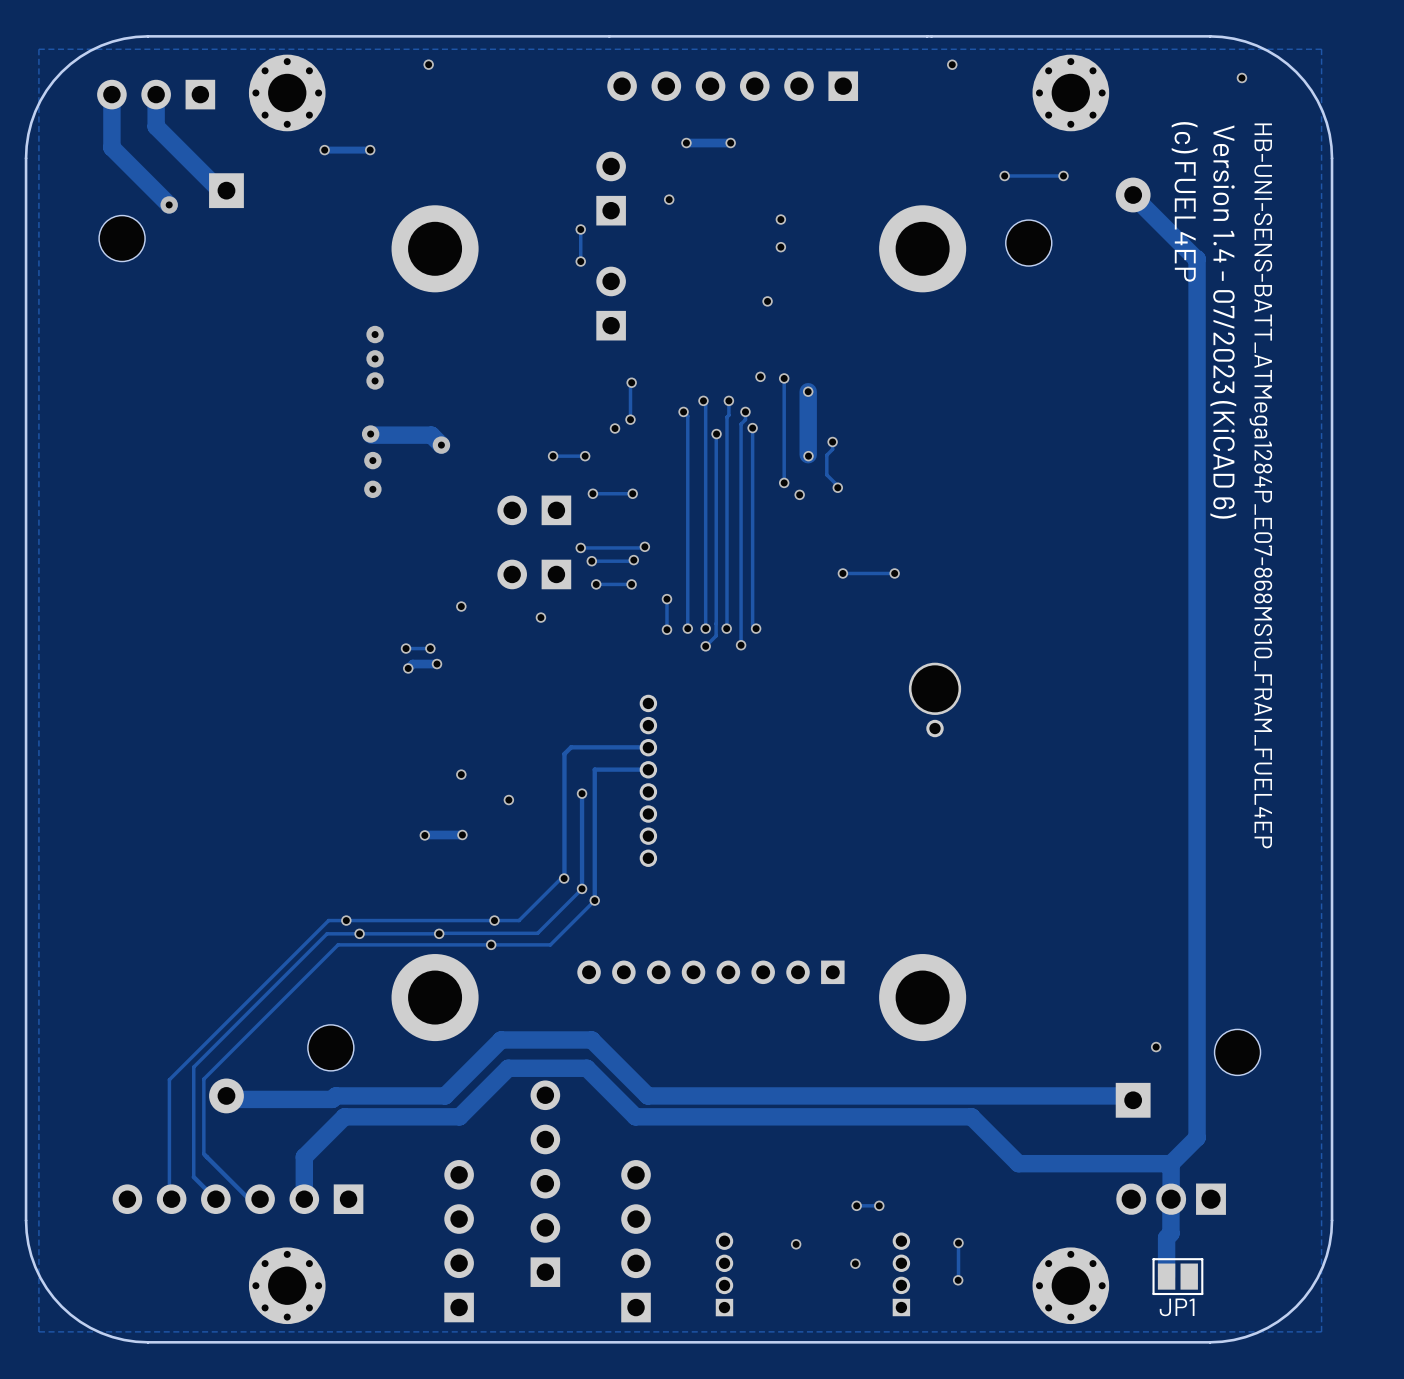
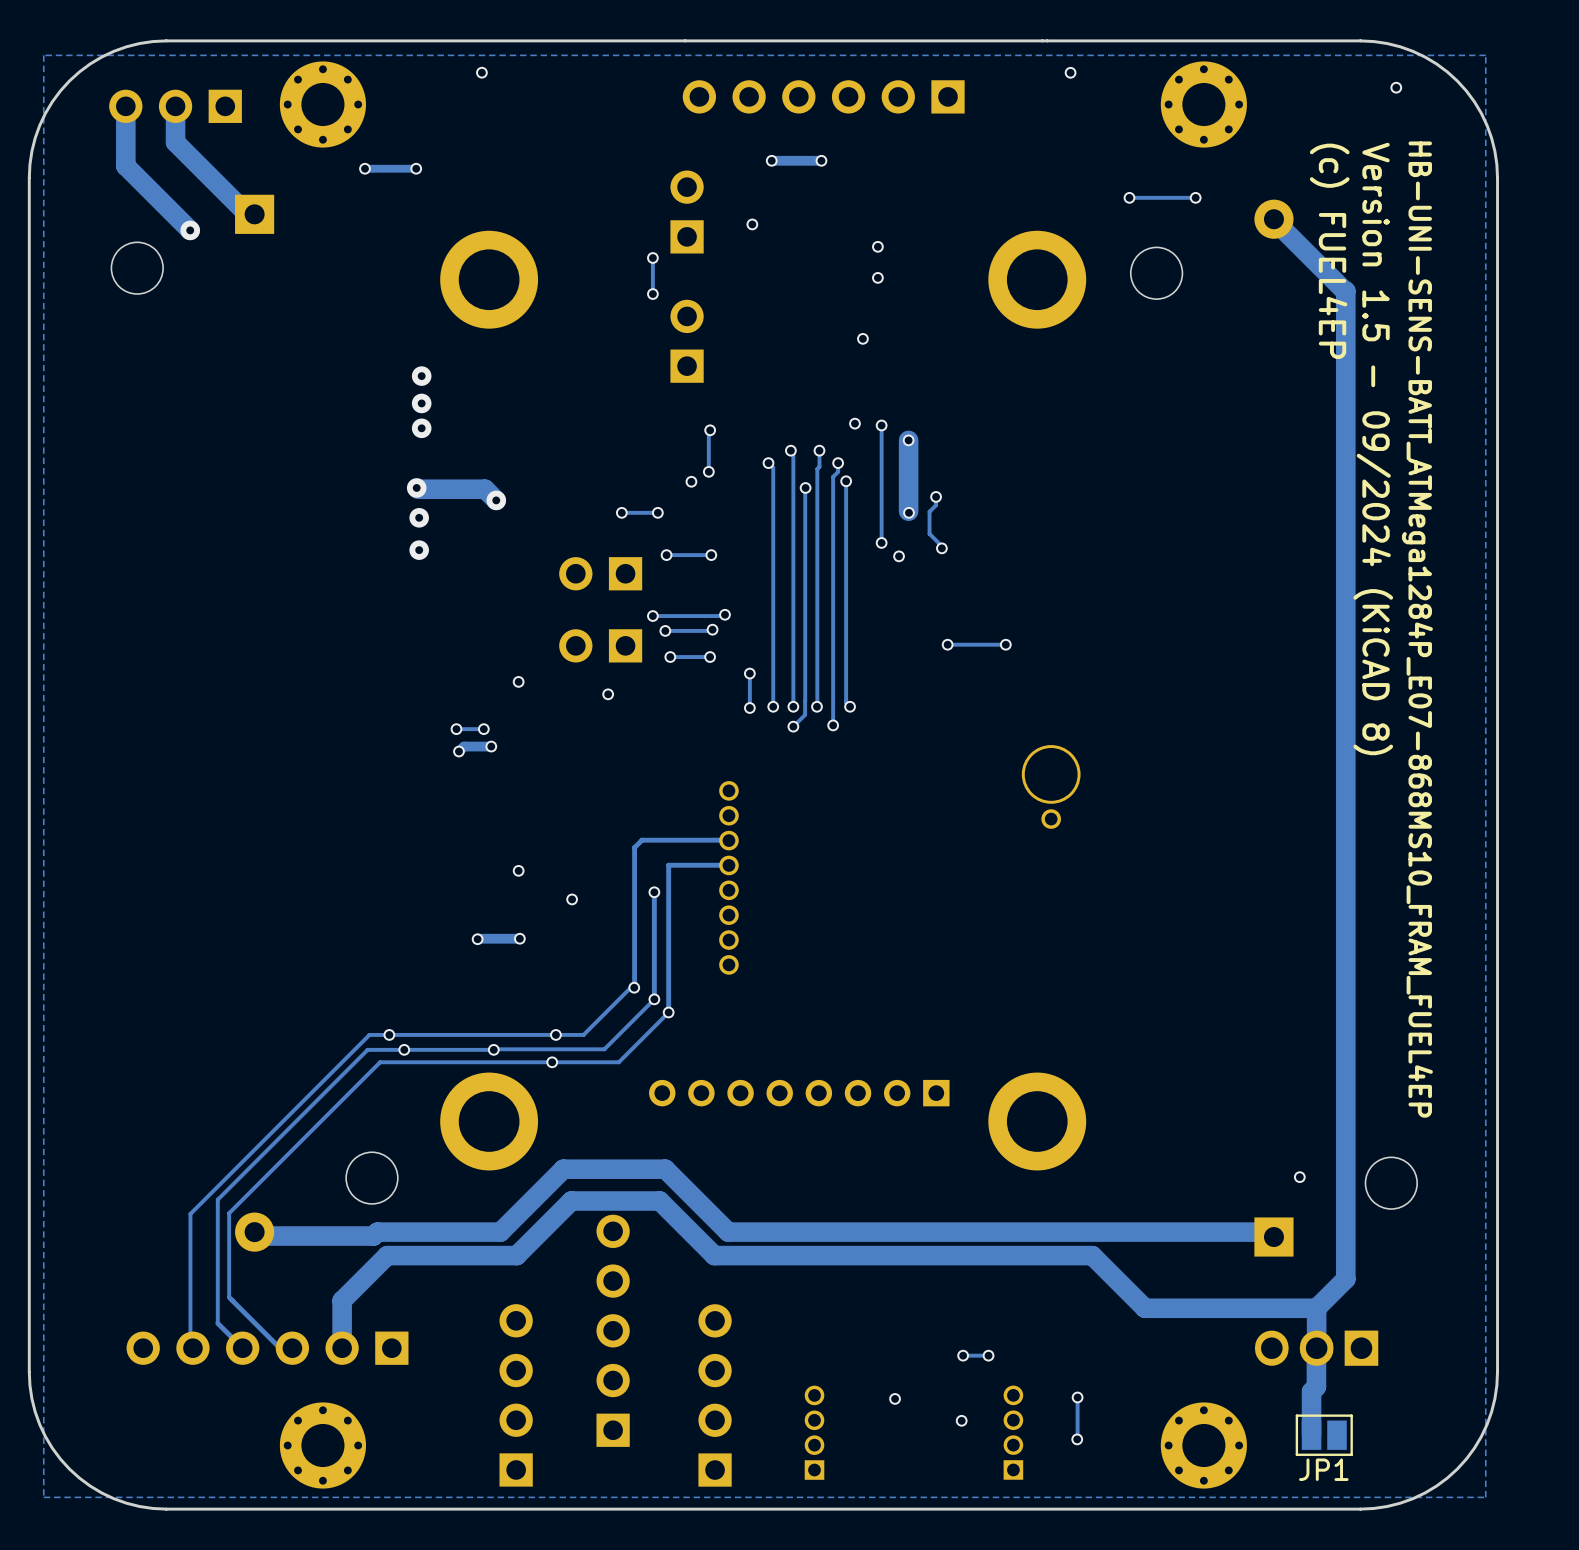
text: Version 1.4 - 07/2023 (KiCAD 6) (1223, 322) -> Version 1.5 - 09/2024 (KiCAD 8) (1373, 448)

